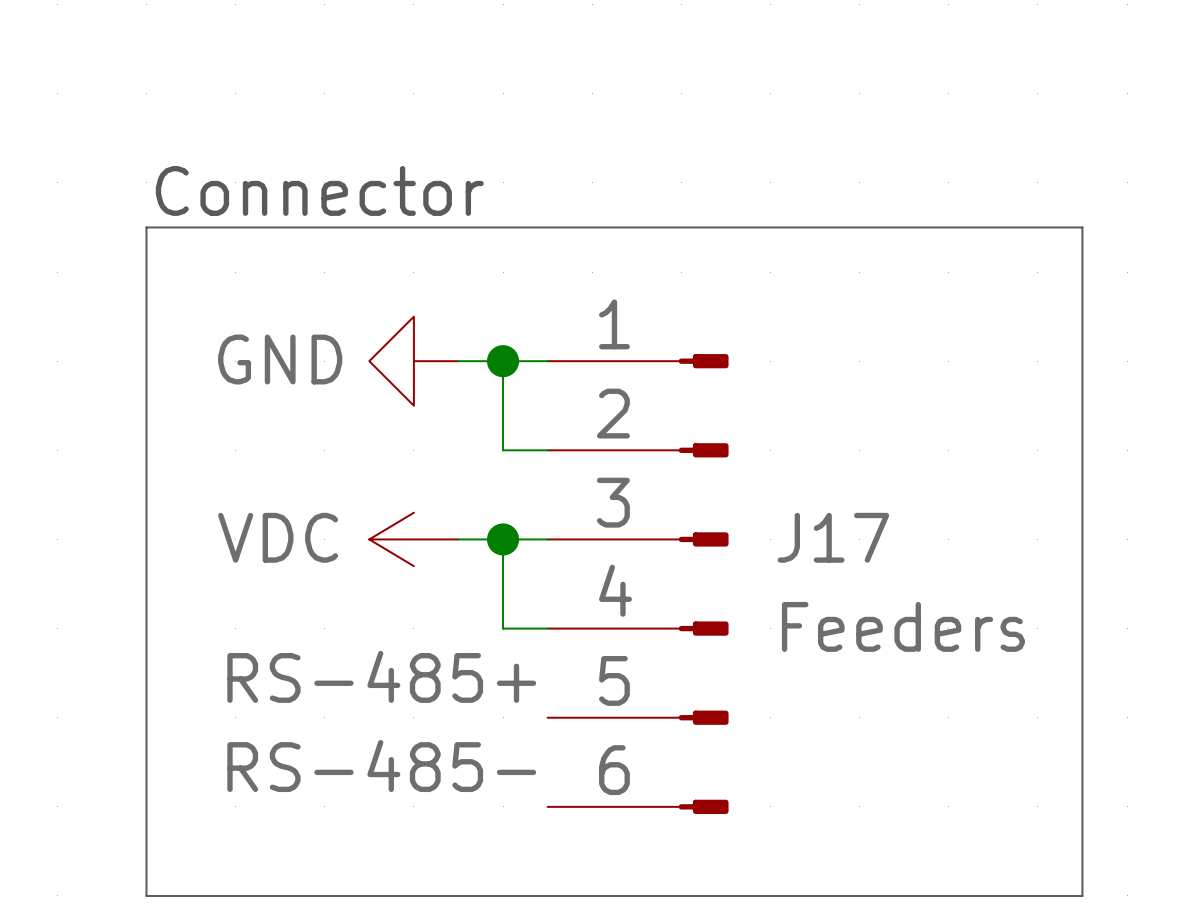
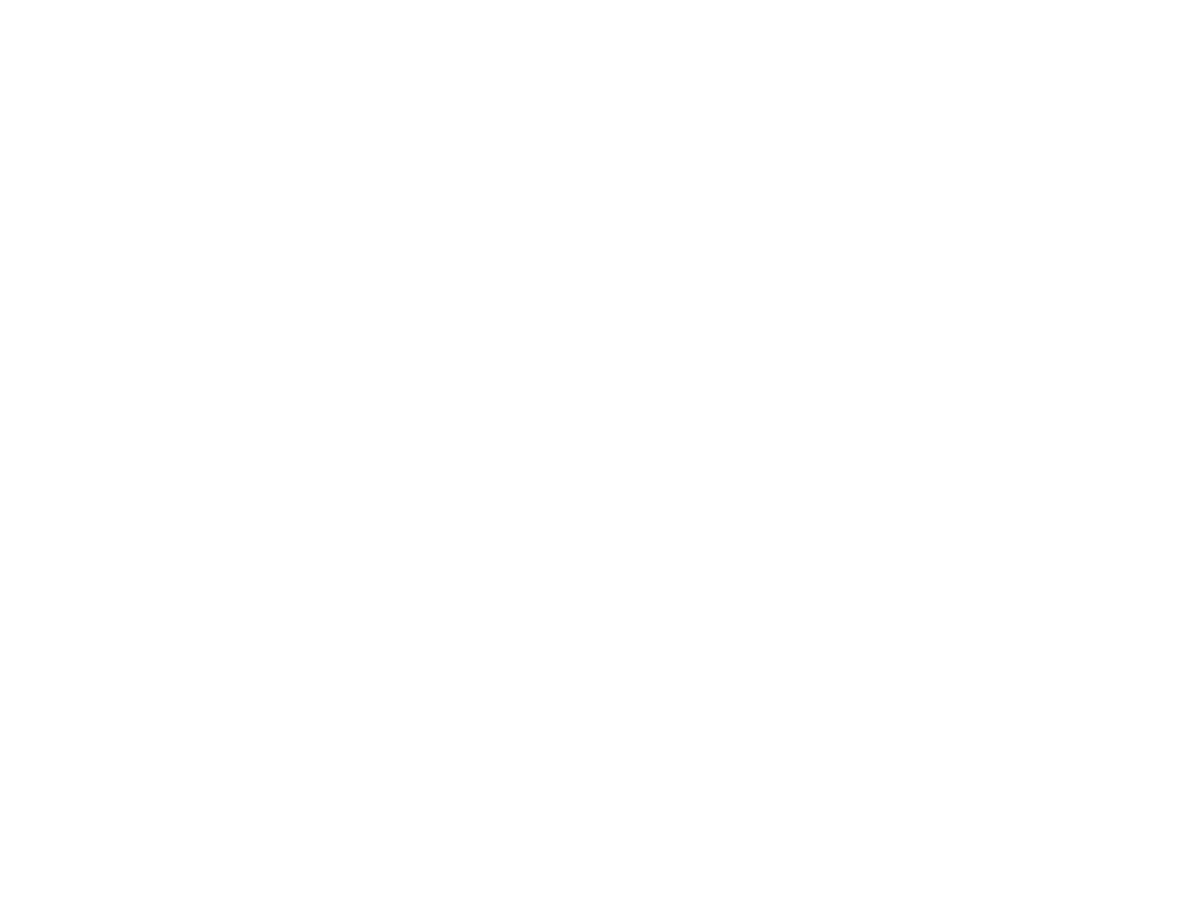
text: Connector (319, 190) -> none
line: (146, 227) (146, 895) (1082, 895) (1082, 227) (146, 227) -> none
power symbol: GND (413, 361) -> none
wire: (458, 361) (547, 361) -> none
wire: (503, 361) (503, 450) (547, 450) -> none
junction: (503, 361) -> none
power symbol: VDC (413, 539) -> none
wire: (458, 539) (547, 539) -> none
wire: (503, 539) (503, 628) (547, 628) -> none
junction: (503, 539) -> none
J17: Feeders (638, 584) -> none
label: RS-485+ (381, 676) -> none
label: RS-485- (381, 766) -> none

